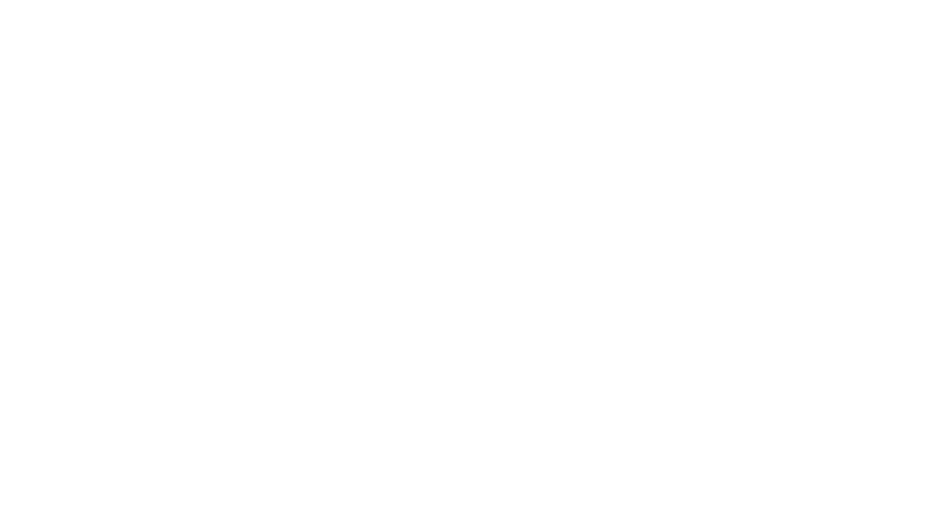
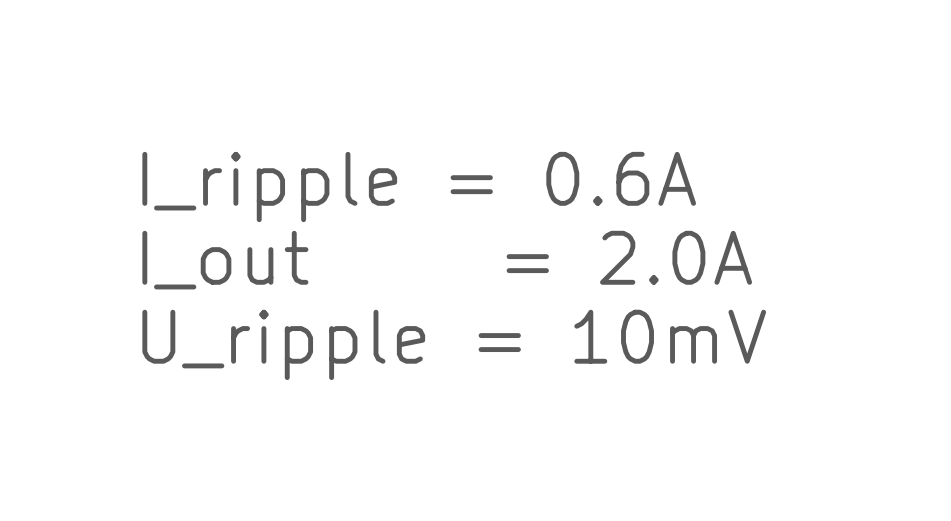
text: none -> I_ripple = 0.6A (419, 187)
text: none -> I_out = 2.0A (447, 260)
text: none -> U_ripple = 10mV (454, 344)

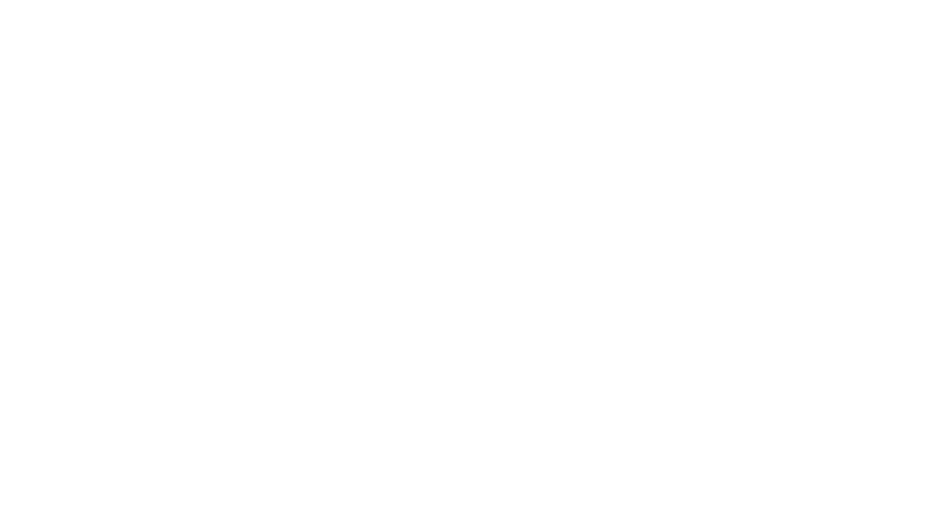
text: I_ripple = 0.6A (419, 187) -> none
text: I_out = 2.0A (447, 260) -> none
text: U_ripple = 10mV (454, 344) -> none

